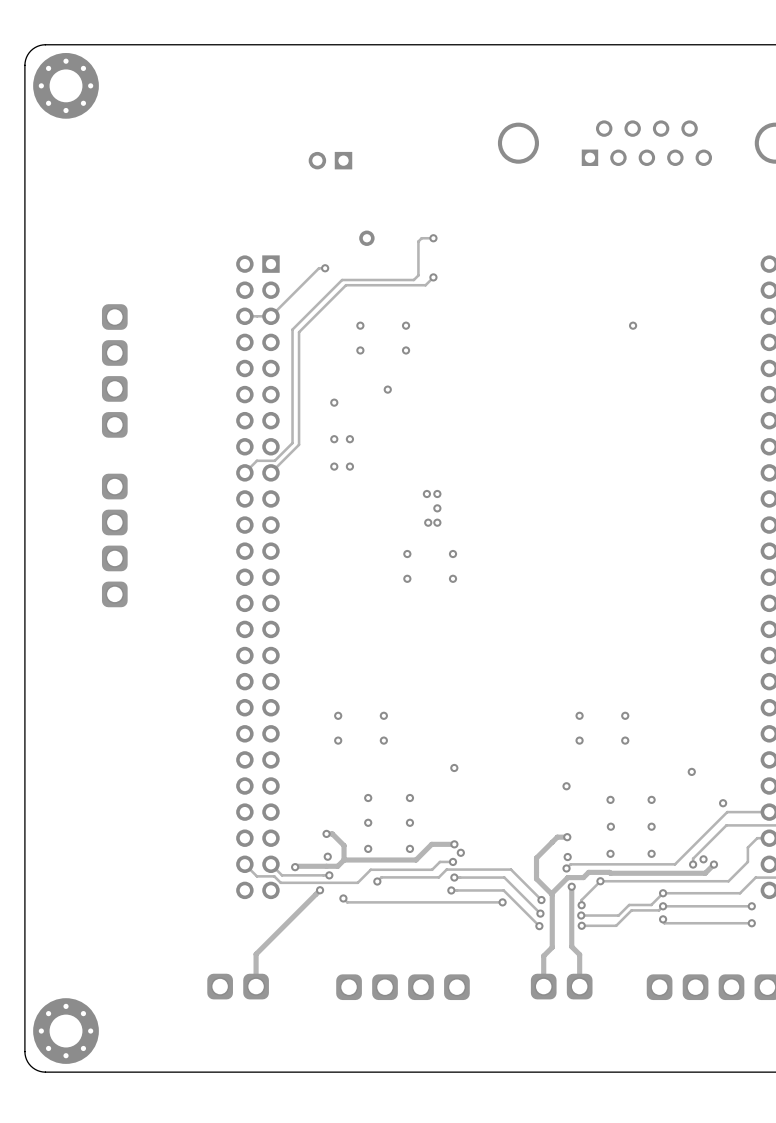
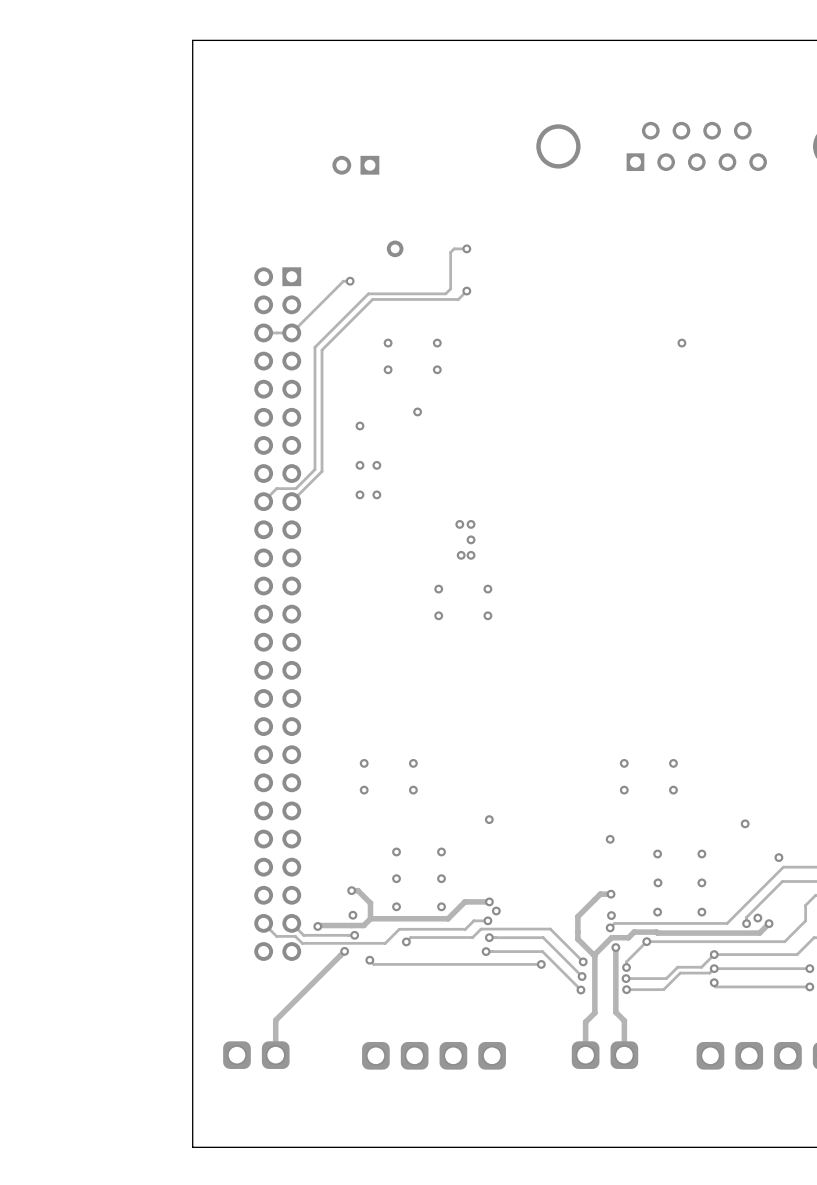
board edge: (179, 44) (42, 44) (35, 47) (29, 52) (24, 65) (25, 1054) (30, 1066) (42, 1071) (179, 1072) -> (192, 40) (192, 1147)
part: (66, 85) -> none
part: (114, 370) -> none
part: (114, 540) -> none
part: (66, 1031) -> none

